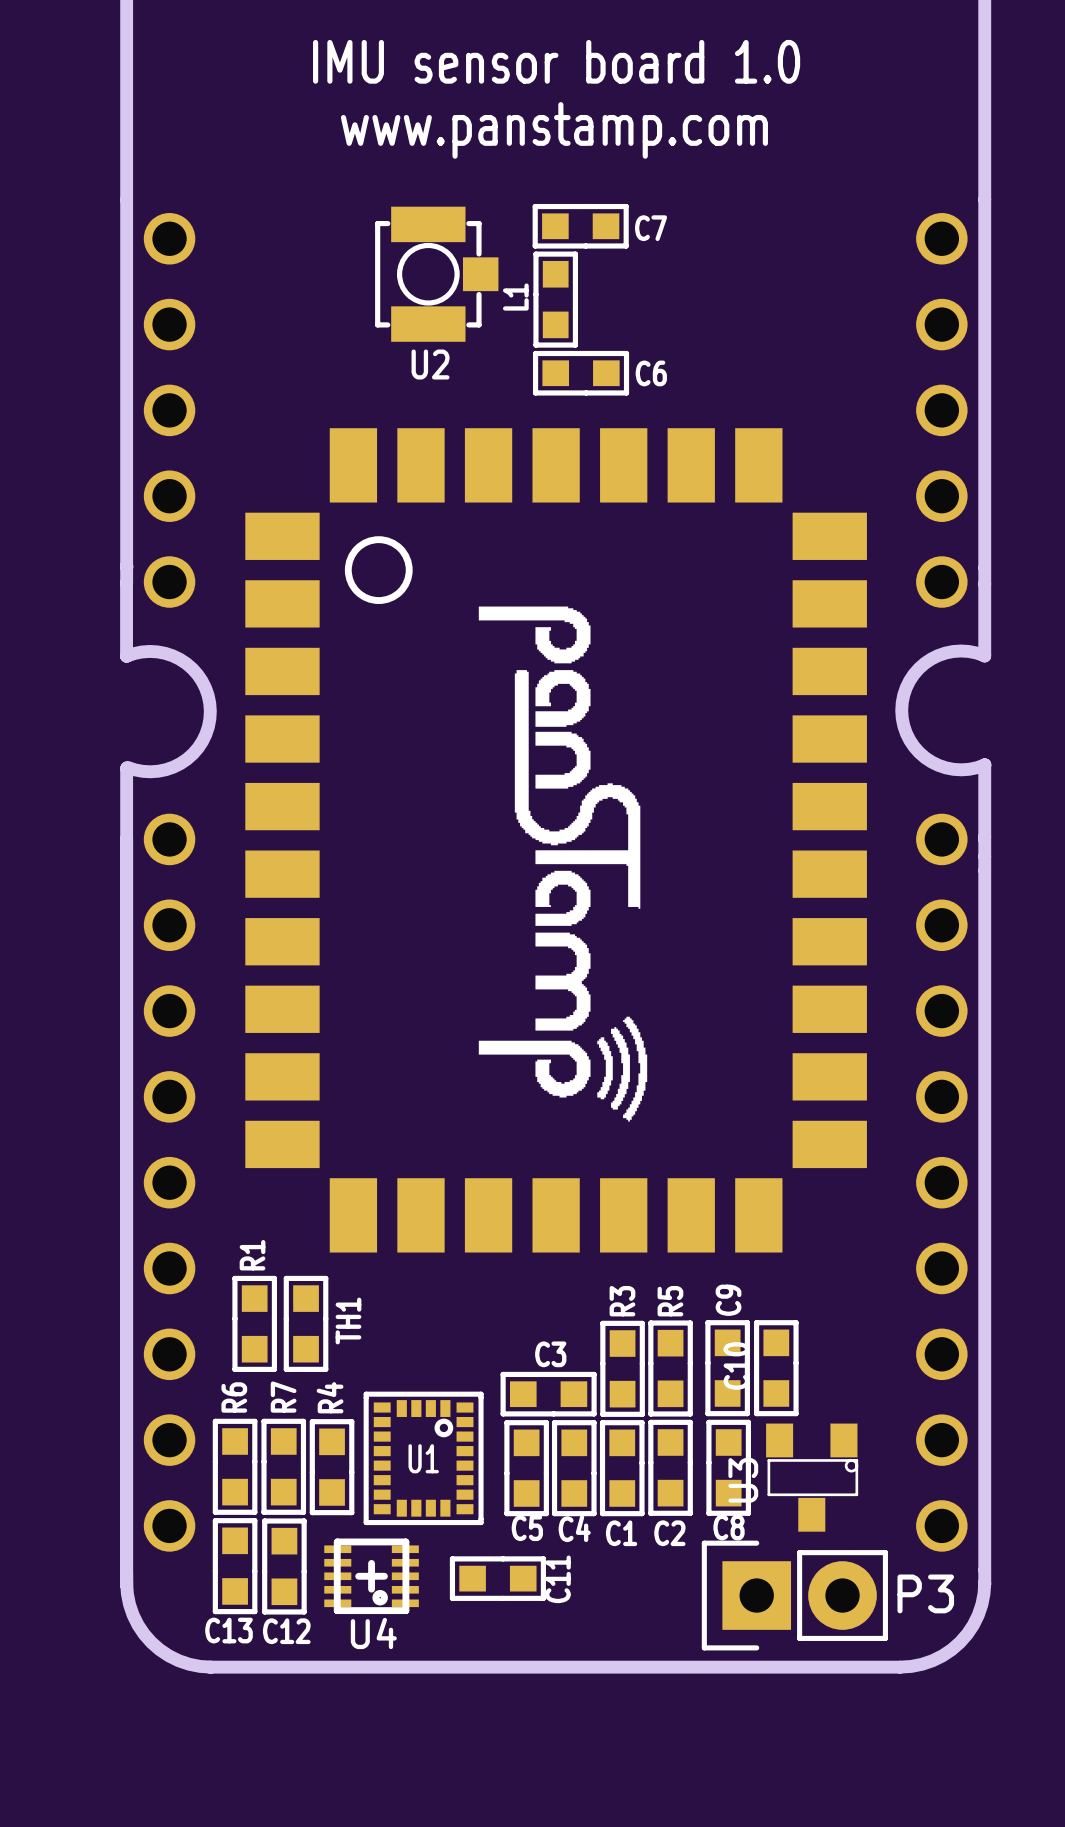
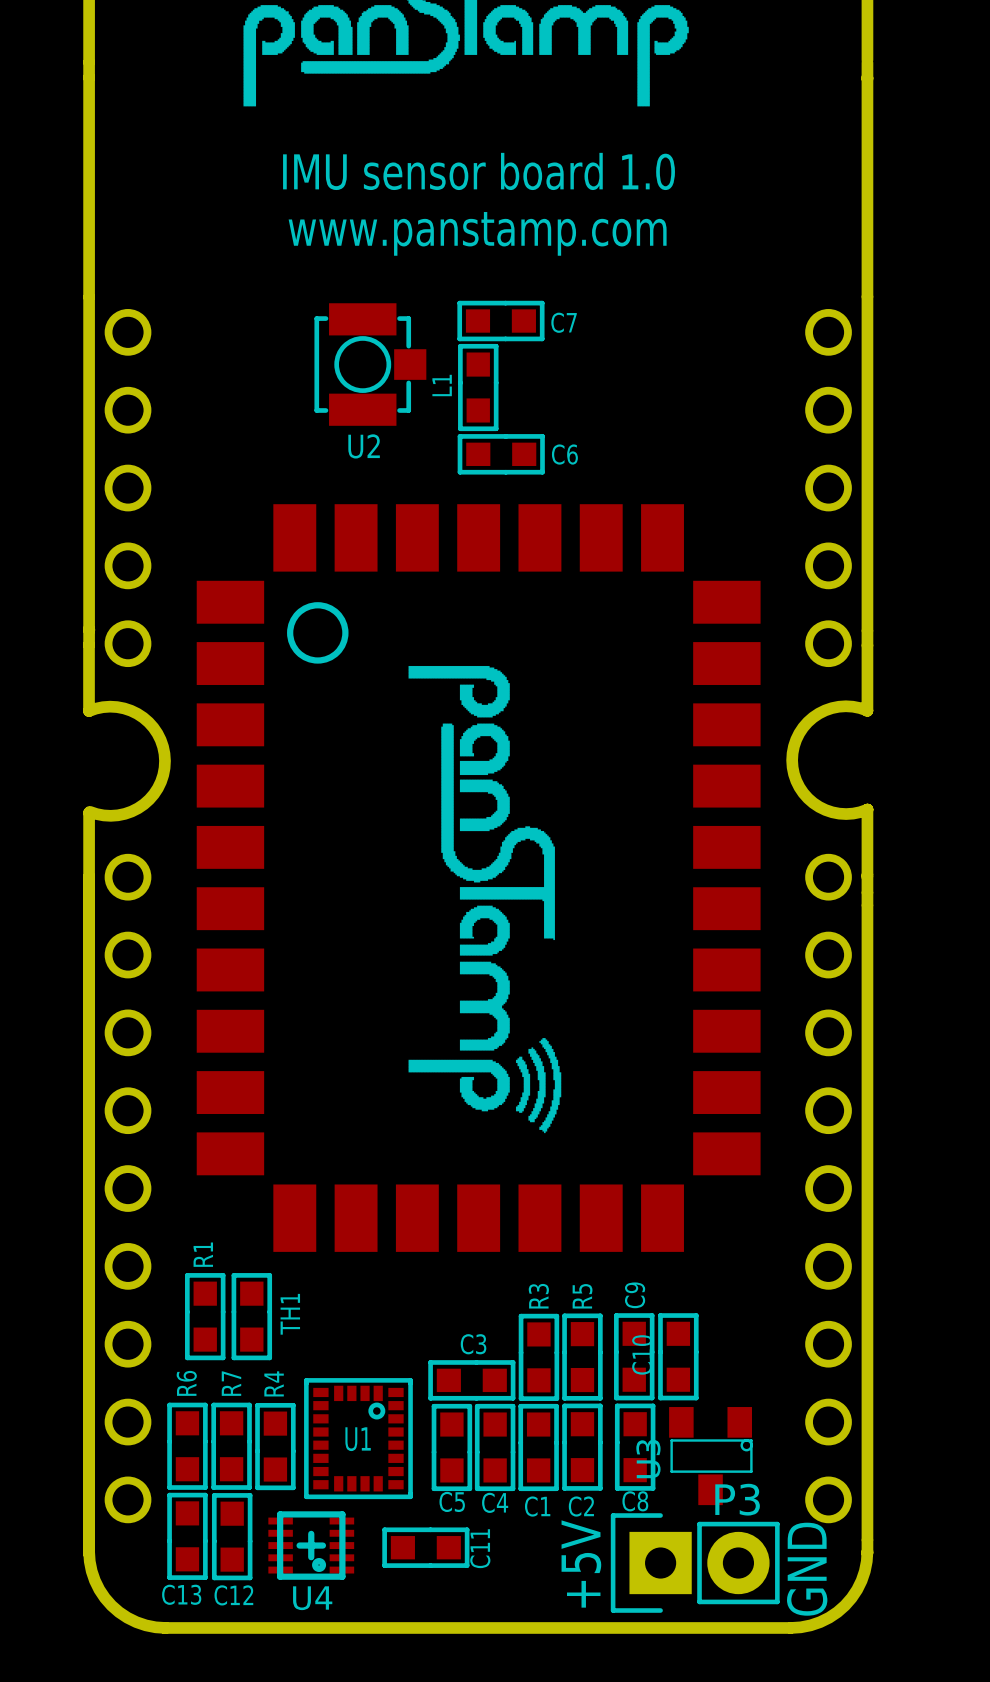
P3 name position: P3 (925, 1593) -> P3 (737, 1499)
text: none -> +5V (581, 1563)
text: none -> GND (807, 1569)

